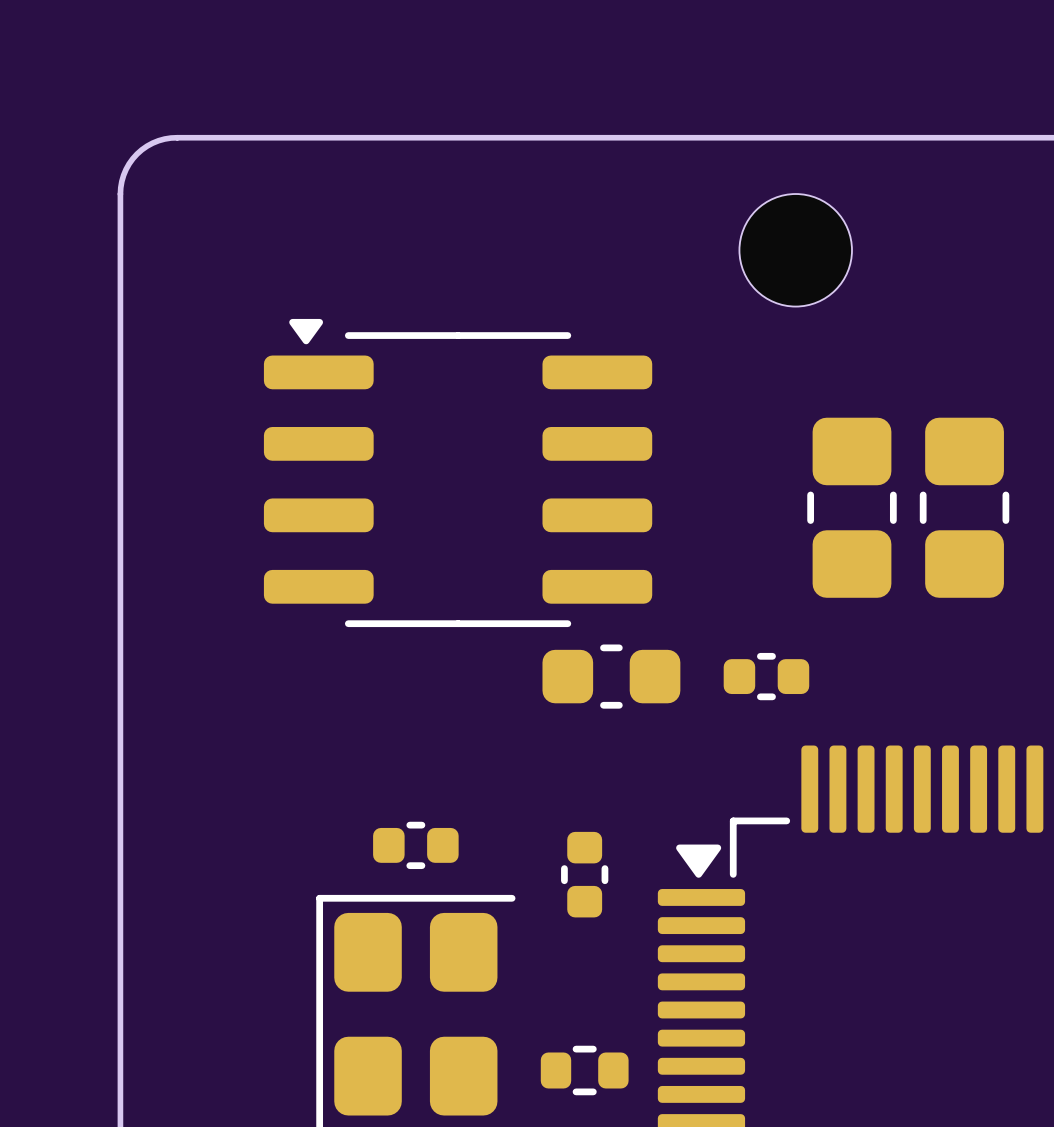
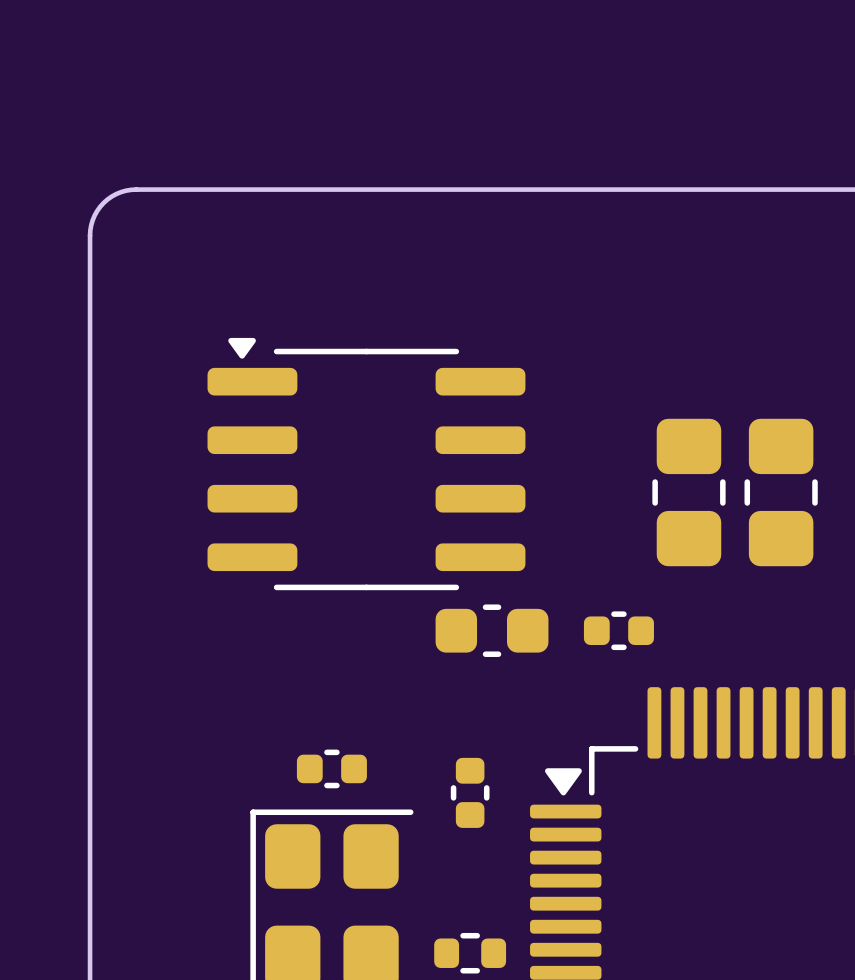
part: (795, 250) -> none

